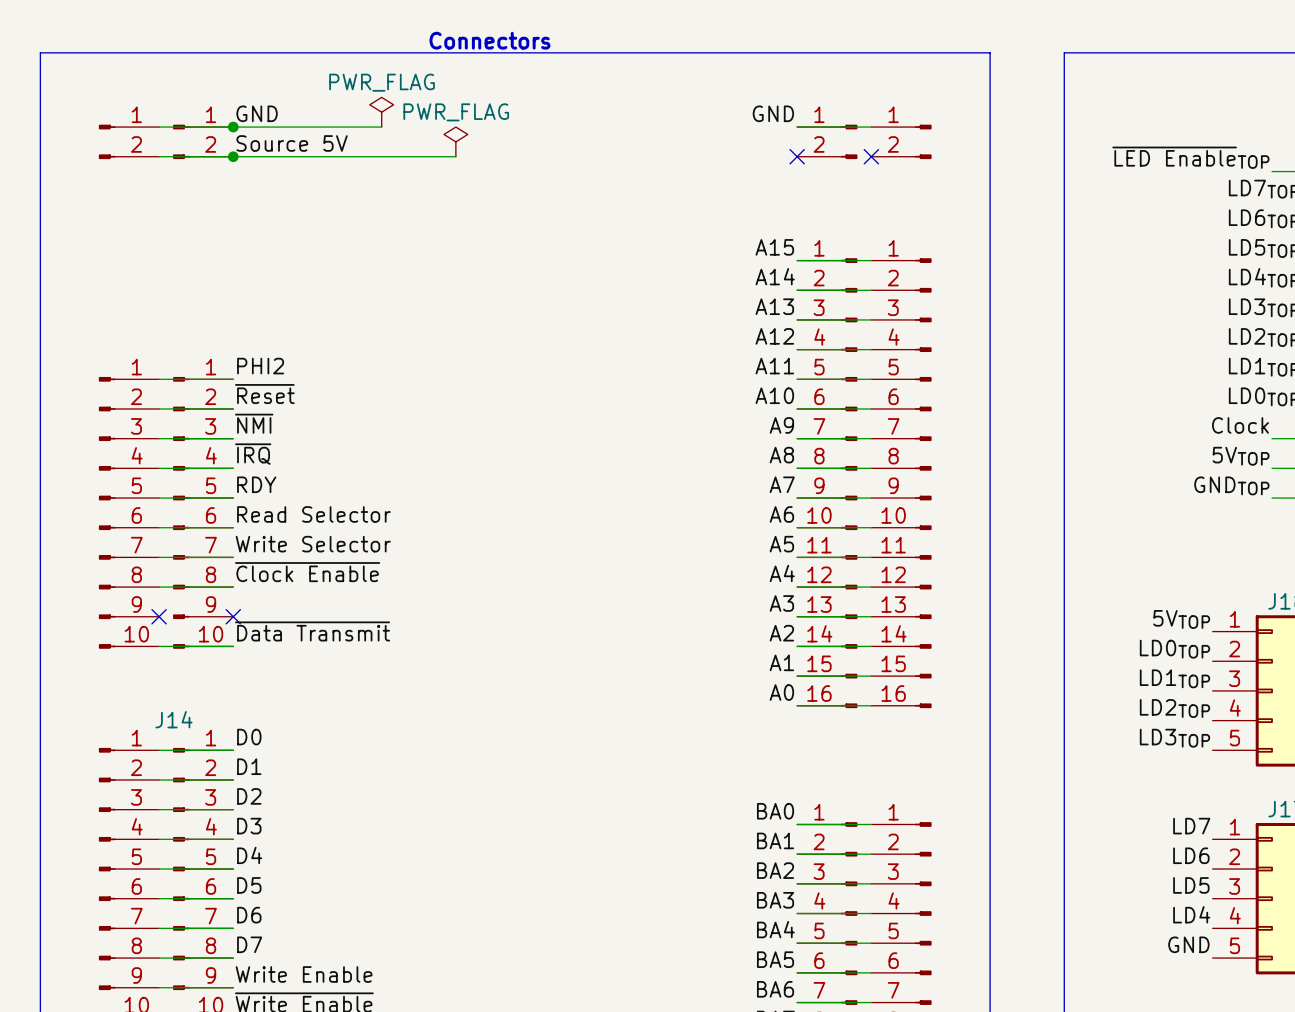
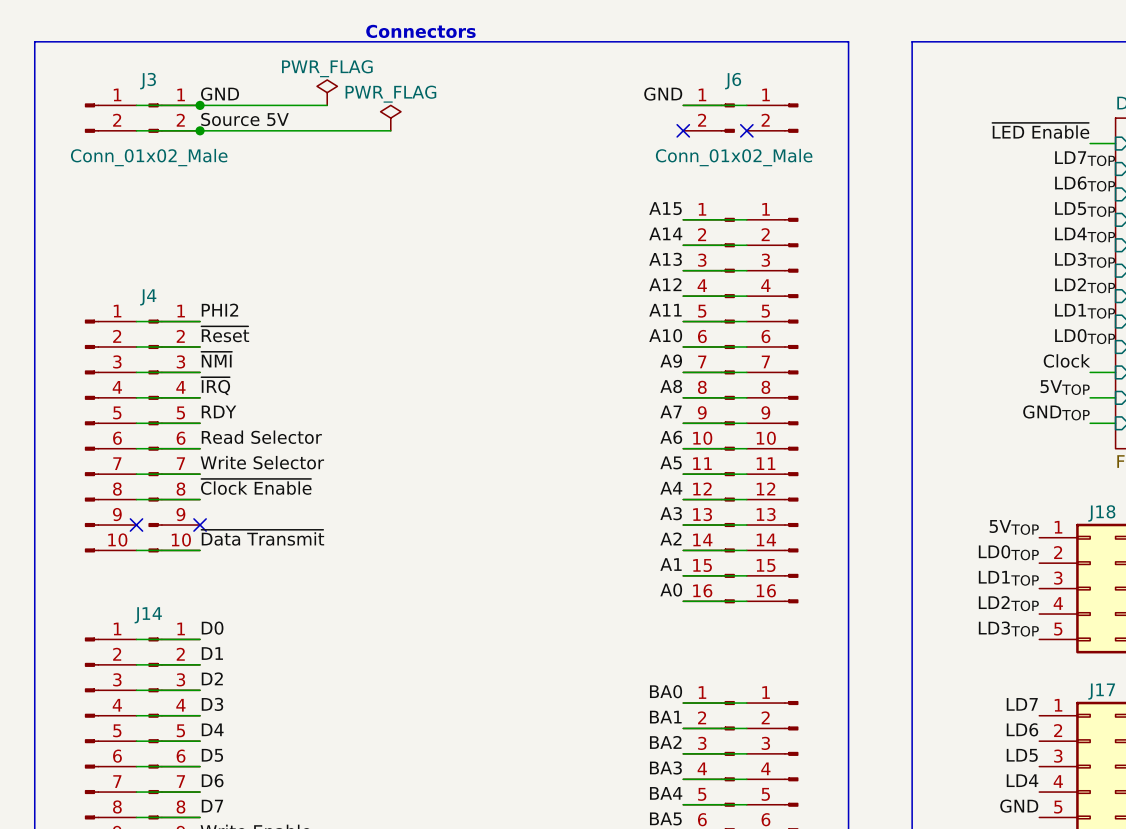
J3 name: none -> J3 (148, 81)
J6 name: none -> J6 (733, 81)
label: ~{LED Enable}TOP (1190, 157) -> ~{LED Enable} (1040, 130)
J3 value: none -> Conn_01x02_Male (149, 157)
J6 value: none -> Conn_01x02_Male (734, 157)
J4 name: none -> J4 (148, 297)

